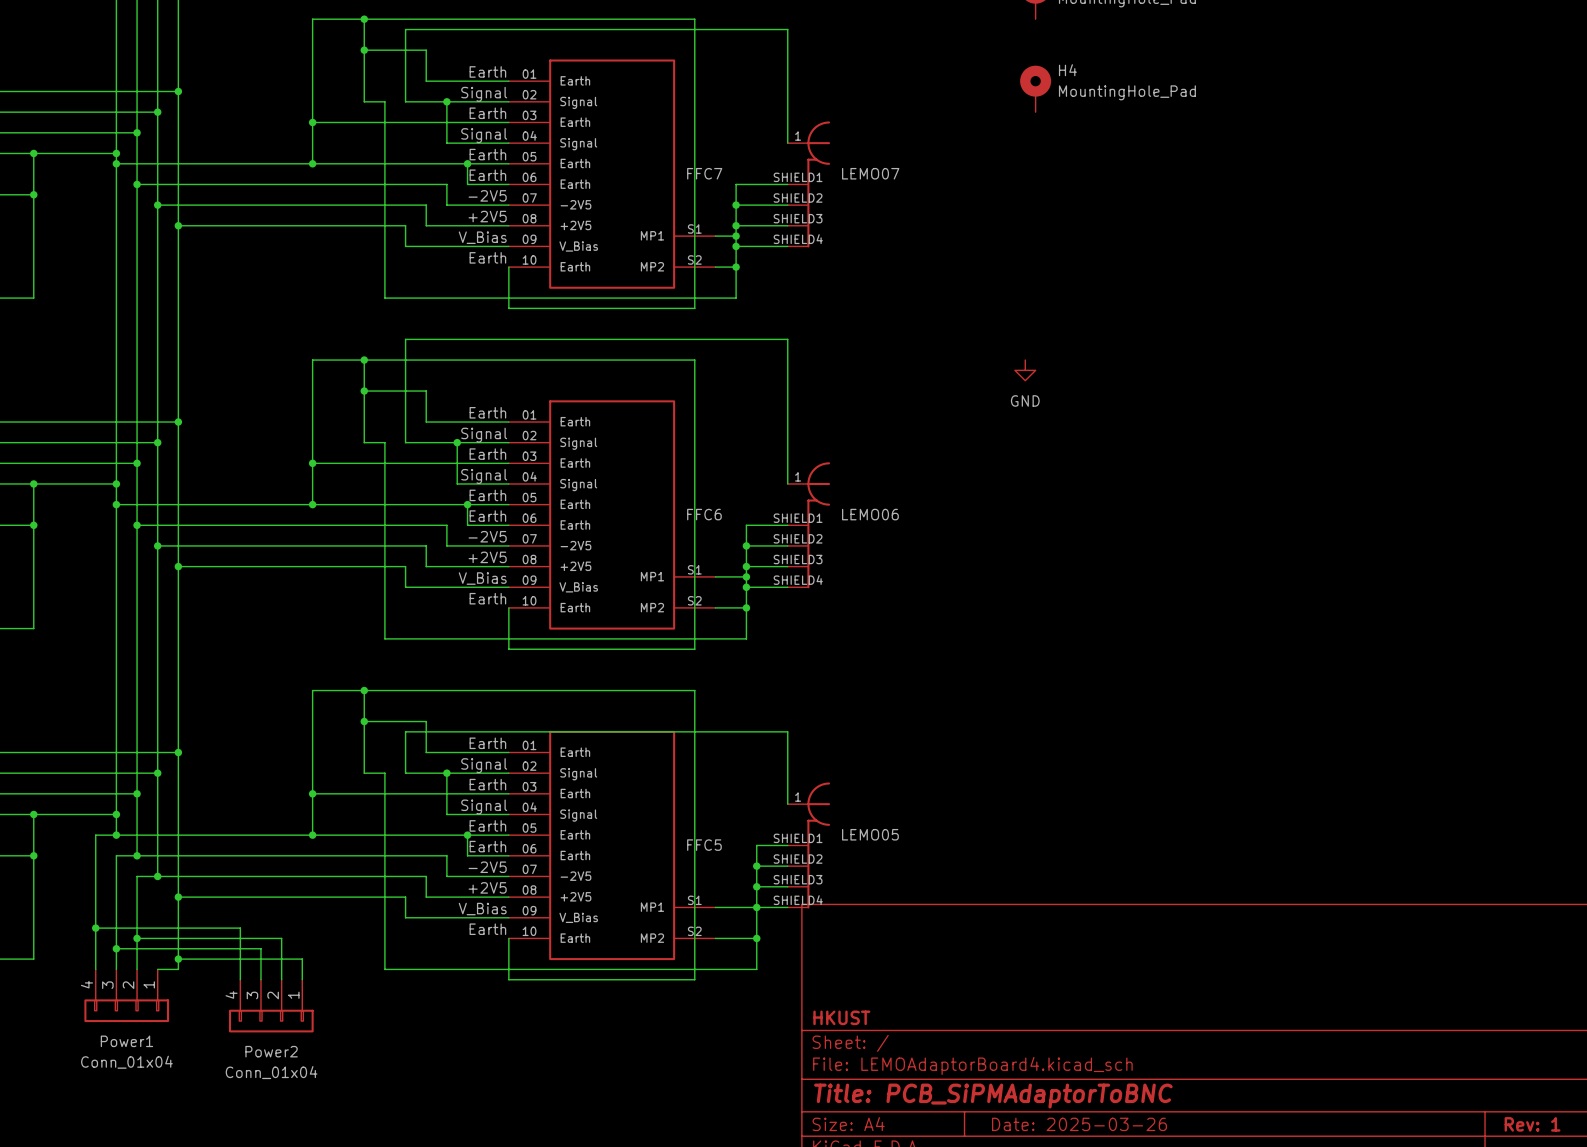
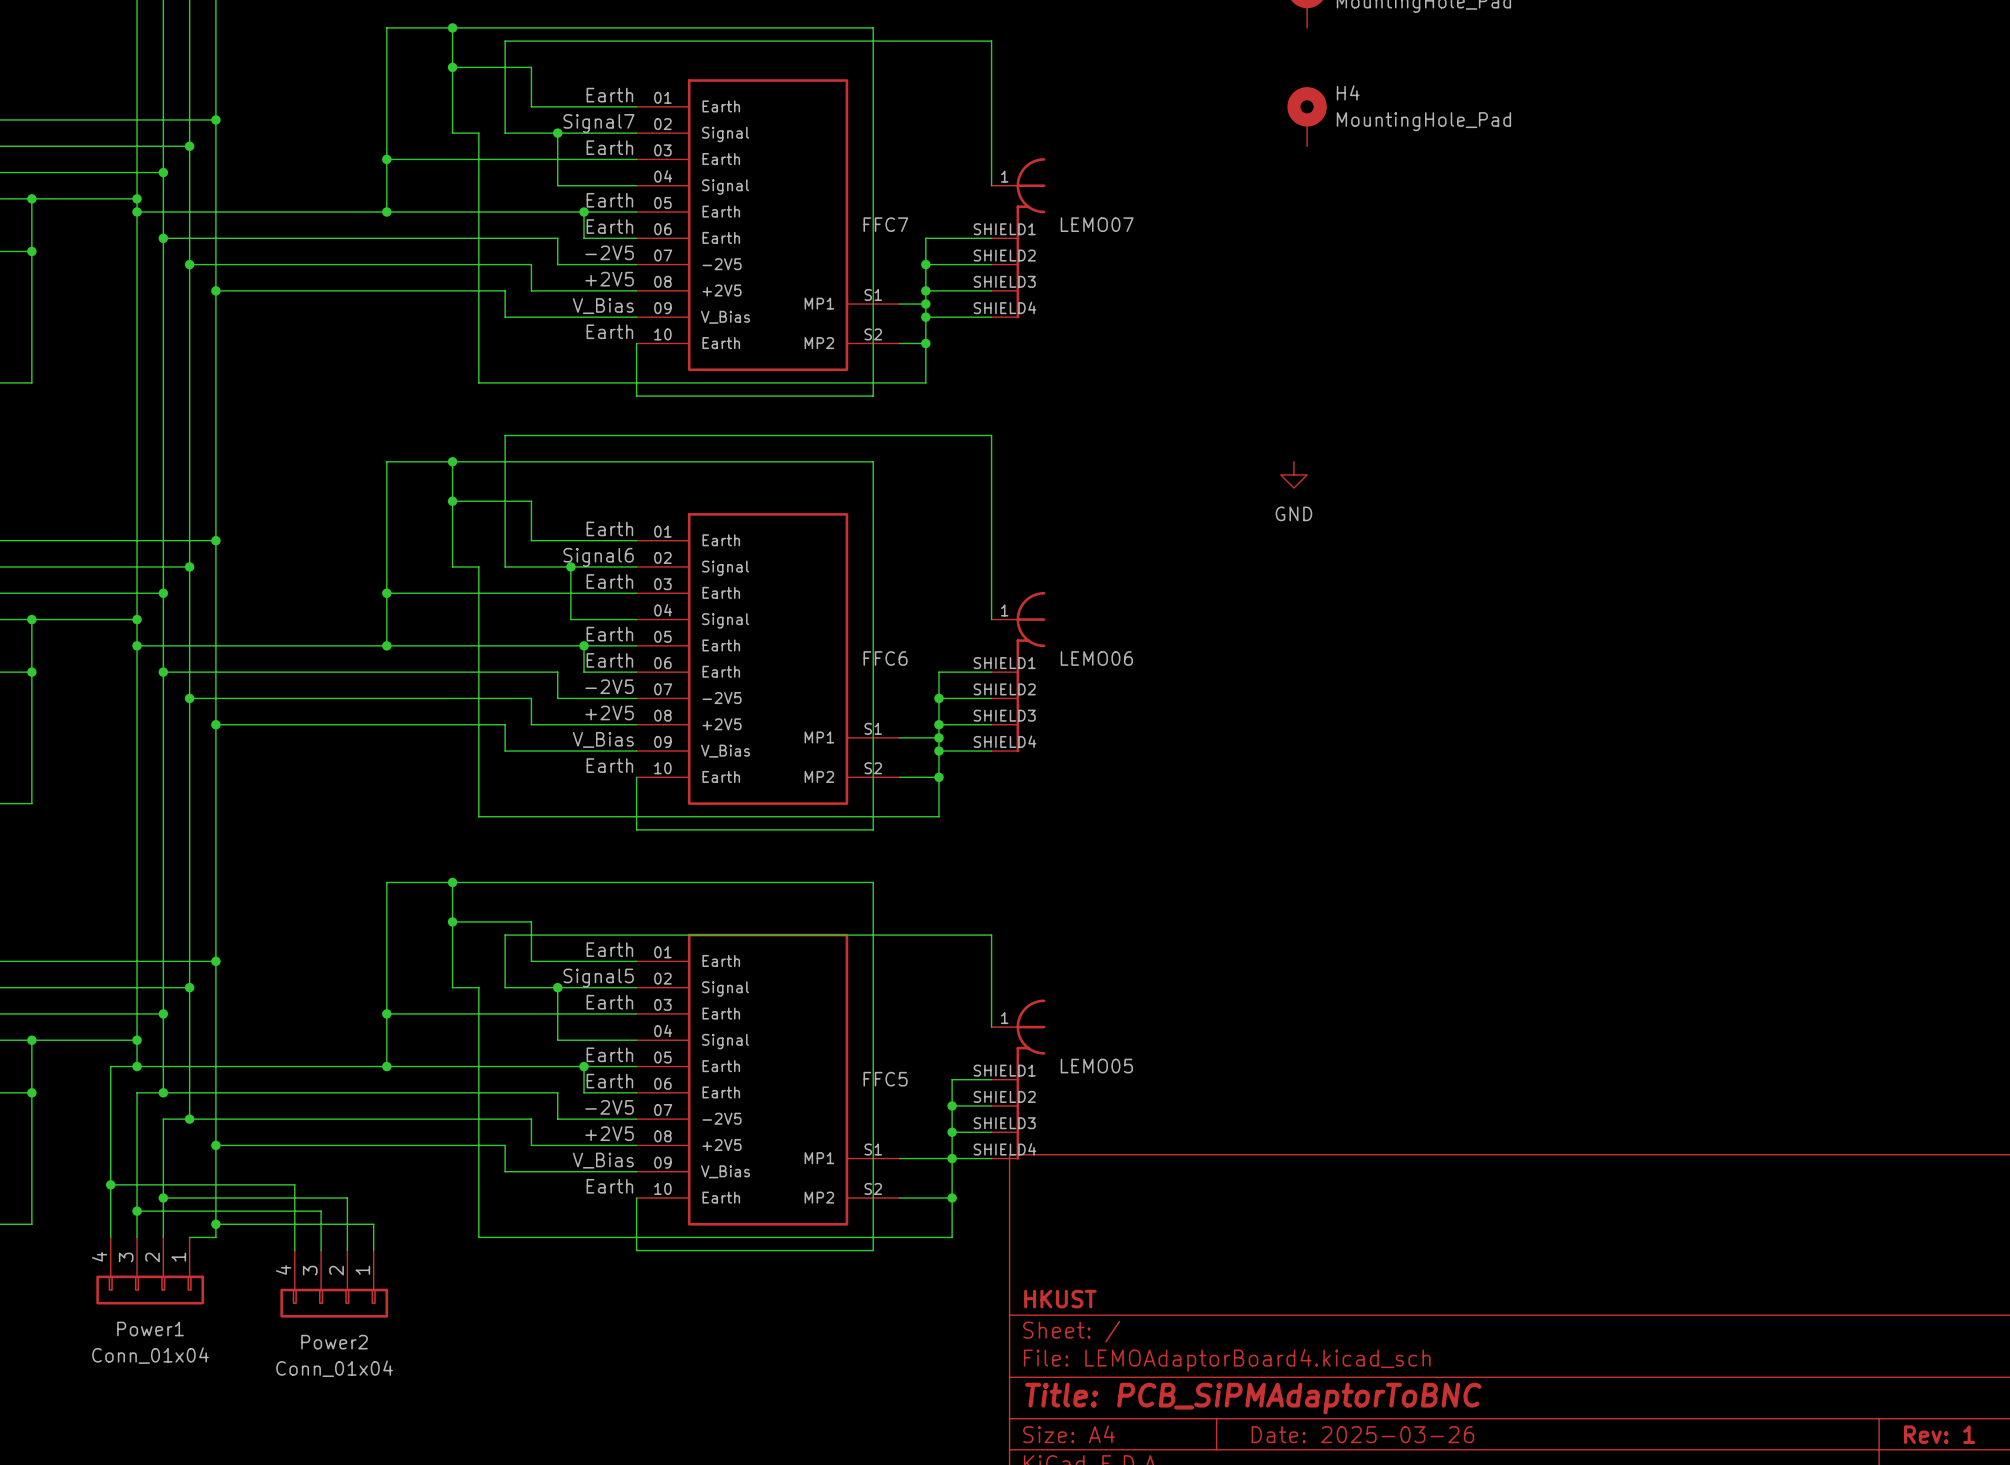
label: Signal (484, 94) -> Signal7 (598, 123)
label: Signal (484, 135) -> none
label: Signal (484, 435) -> Signal6 (598, 557)
label: Signal (484, 476) -> none
label: Signal (484, 765) -> Signal5 (598, 978)
label: Signal (484, 806) -> none

